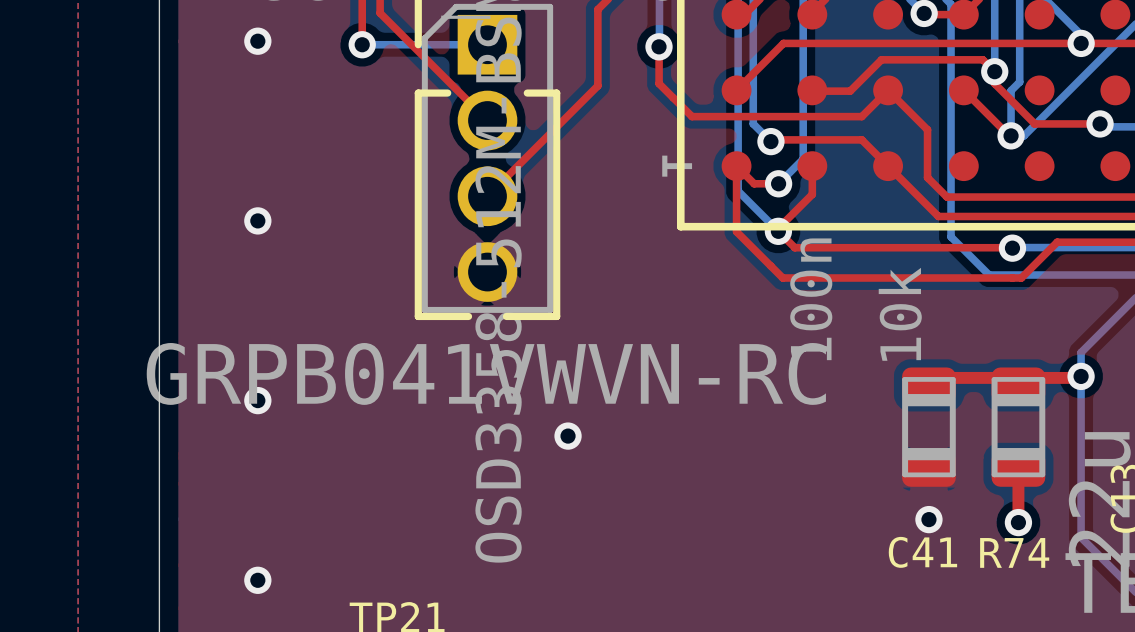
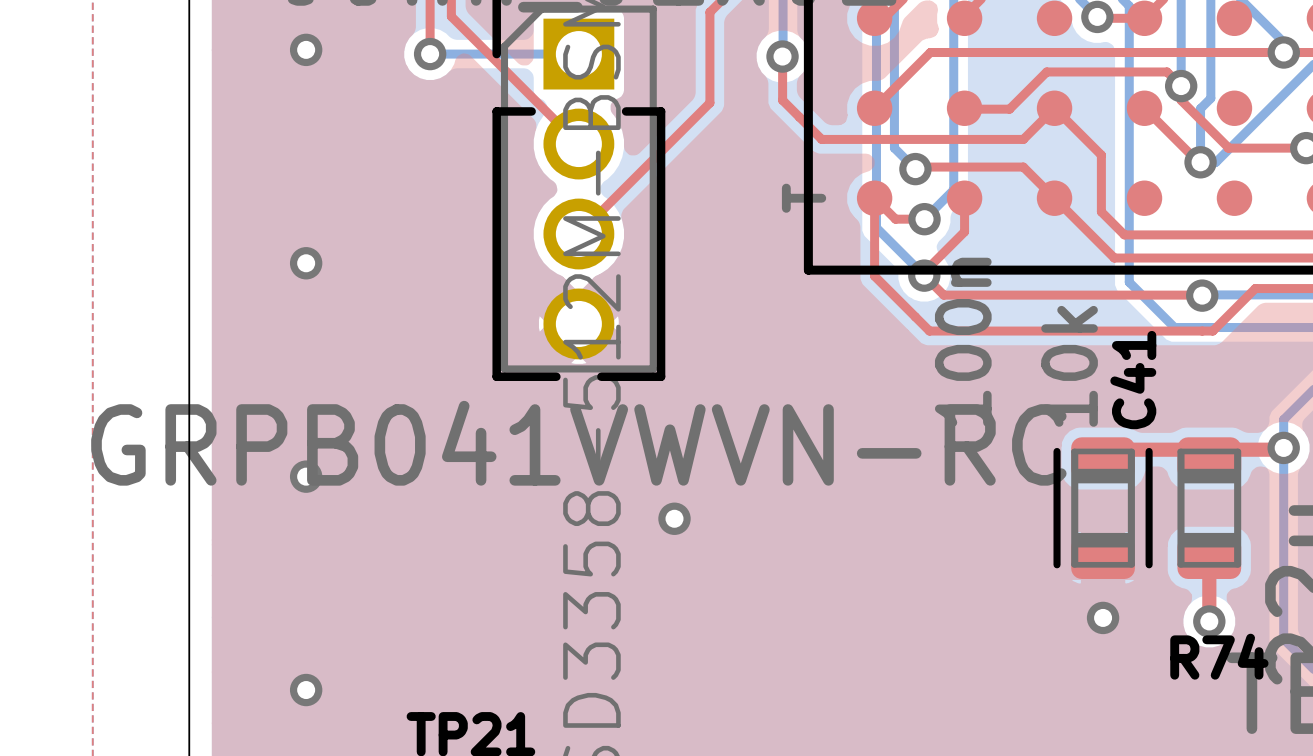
C41 footprint: [902, 367, 956, 487] -> [1053, 437, 1153, 579]
C41 name position: C41 (922, 552) -> C41 (1133, 380)

